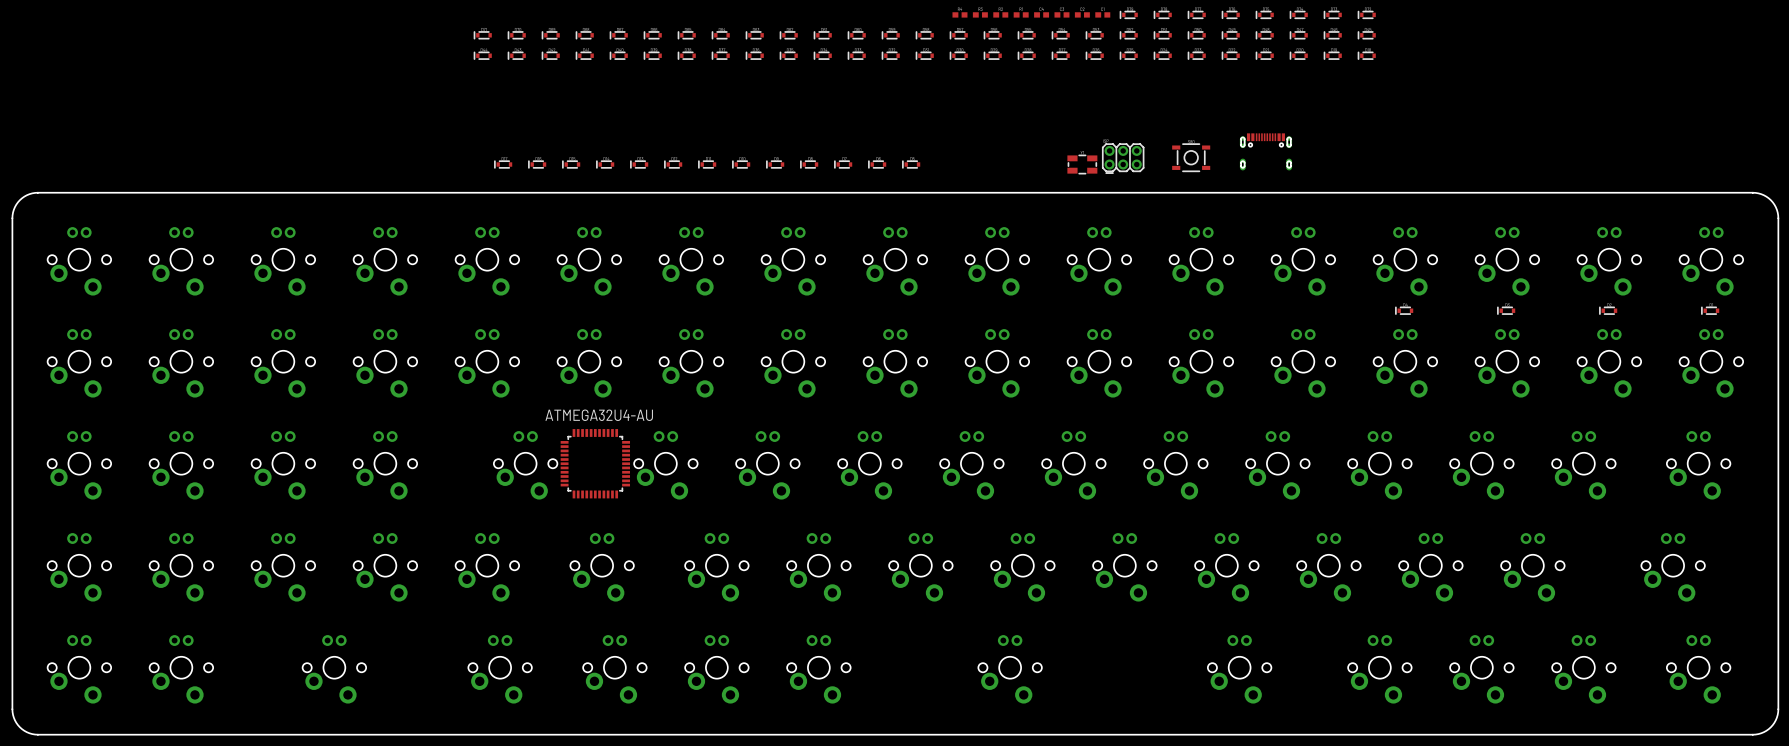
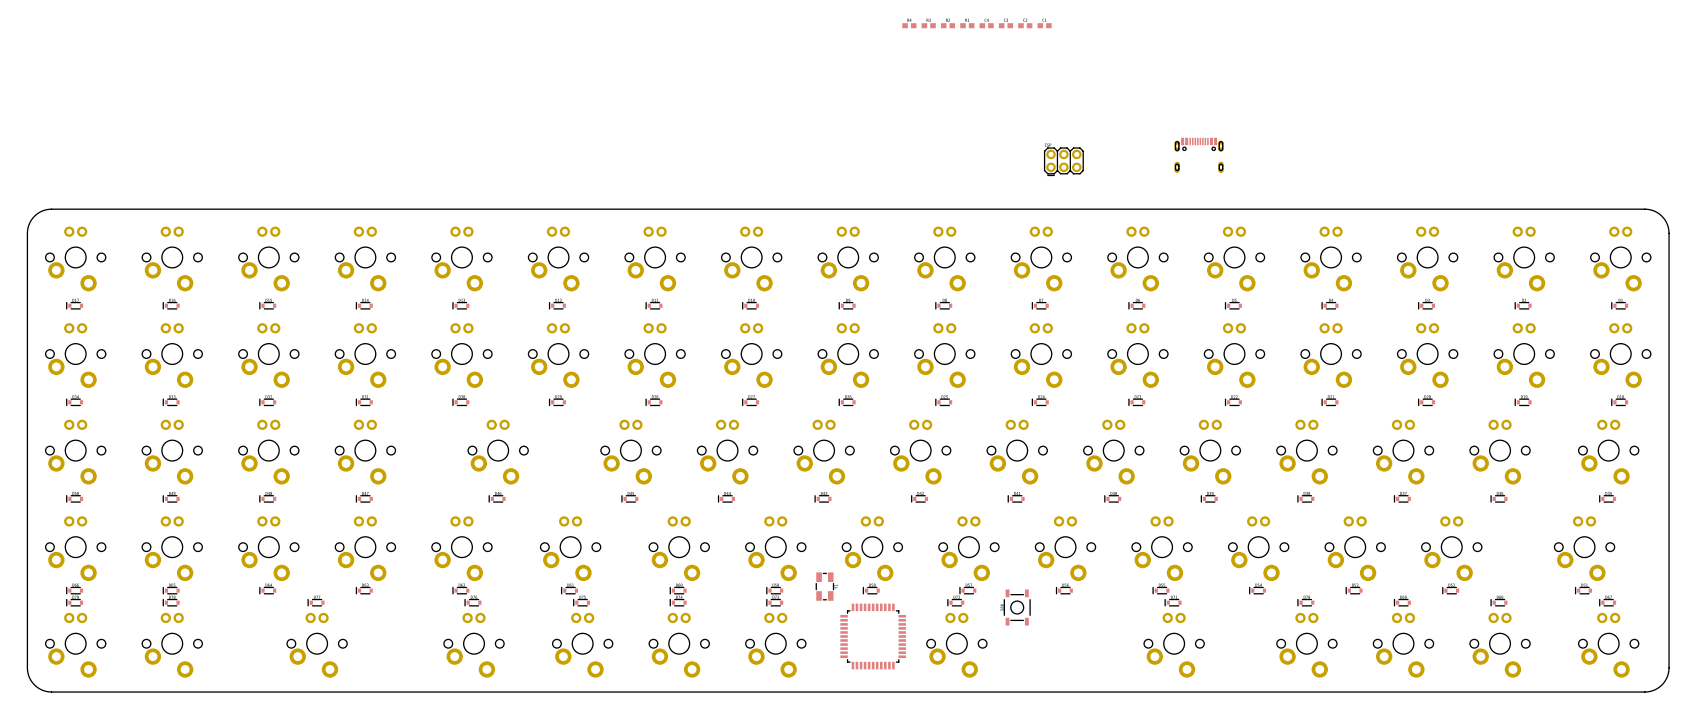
part position: (1128, 14) -> (74, 602)
part position: (1162, 14) -> (171, 602)
part position: (1196, 14) -> (316, 602)
part position: (1230, 14) -> (473, 602)
part position: (1264, 14) -> (581, 602)
part position: (1298, 14) -> (678, 602)
part position: (1332, 14) -> (774, 602)
part position: (1366, 14) -> (955, 602)
part position: (482, 35) -> (1173, 602)
part position: (516, 35) -> (1305, 602)
part position: (550, 35) -> (1402, 602)
part position: (584, 35) -> (1499, 602)
part position: (618, 35) -> (1607, 602)
part position: (652, 35) -> (74, 590)
part position: (686, 35) -> (171, 590)
part position: (720, 35) -> (267, 590)
part position: (754, 35) -> (364, 590)
part position: (788, 35) -> (460, 590)
part position: (822, 35) -> (569, 590)
part position: (856, 35) -> (678, 590)
part position: (890, 35) -> (774, 590)
part position: (924, 35) -> (871, 590)
part position: (958, 35) -> (967, 590)
part position: (992, 35) -> (1064, 590)
part position: (1026, 35) -> (1161, 590)
part position: (1060, 35) -> (1257, 590)
part position: (1094, 35) -> (1354, 590)
part position: (1128, 35) -> (1450, 590)
part position: (1162, 35) -> (1583, 590)
part position: (1196, 35) -> (74, 498)
part position: (1230, 35) -> (171, 498)
part position: (1264, 35) -> (267, 498)
part position: (1298, 35) -> (364, 498)
part position: (1332, 35) -> (497, 498)
part position: (1366, 35) -> (629, 498)
part position: (482, 55) -> (726, 498)
part position: (516, 55) -> (823, 498)
part position: (550, 55) -> (919, 498)
part position: (584, 55) -> (1016, 498)
part position: (618, 55) -> (1112, 498)
part position: (652, 55) -> (1209, 498)
part position: (686, 55) -> (1305, 498)
part position: (720, 55) -> (1402, 498)
part position: (754, 55) -> (1499, 498)
part position: (788, 55) -> (1607, 498)
part position: (822, 55) -> (74, 402)
part position: (856, 55) -> (171, 402)
part position: (890, 55) -> (267, 402)
part position: (924, 55) -> (364, 402)
part position: (958, 55) -> (460, 402)
part position: (992, 55) -> (557, 402)
part position: (1026, 55) -> (654, 402)
part position: (1060, 55) -> (750, 402)
part position: (1094, 55) -> (847, 402)
part position: (1128, 55) -> (943, 402)
part position: (1162, 55) -> (1040, 402)
part position: (1196, 55) -> (1136, 402)
part position: (1230, 55) -> (1233, 402)
part position: (1264, 55) -> (1330, 402)
part position: (1298, 55) -> (1426, 402)
part position: (1332, 55) -> (1523, 402)
part position: (1366, 55) -> (1619, 402)
part rotation: 0° (1191, 157) -> 90° counterclockwise (1017, 607)
part position: (1191, 157) -> (1017, 607)
part position: (503, 164) -> (74, 305)
part position: (537, 164) -> (171, 305)
part position: (571, 164) -> (267, 305)
part position: (605, 164) -> (364, 305)
part position: (639, 164) -> (460, 305)
part position: (673, 164) -> (557, 305)
part position: (707, 164) -> (654, 305)
part position: (741, 164) -> (750, 305)
part position: (775, 164) -> (847, 305)
part position: (809, 164) -> (943, 305)
part position: (843, 164) -> (1040, 305)
part position: (877, 164) -> (1136, 305)
part position: (911, 164) -> (1233, 305)
part rotation: 0° (1082, 164) -> 90° clockwise (824, 586)
part position: (1082, 164) -> (824, 586)
board edge: (37, 192) (1761, 194) (1772, 202) (1778, 218) (1776, 717) (1768, 729) (1752, 734) (29, 733) (17, 725) (12, 709) (12, 218) (14, 207) (19, 200) (26, 195) (37, 192) -> (51, 209) (41, 211) (34, 216) (29, 222) (27, 233) (27, 667) (32, 682) (46, 691) (1644, 692) (1659, 686) (1668, 673) (1669, 233) (1663, 218) (1650, 209) (51, 209)
ATMEGA32U4-AU: (595, 463) -> none
part: none -> (873, 636)

